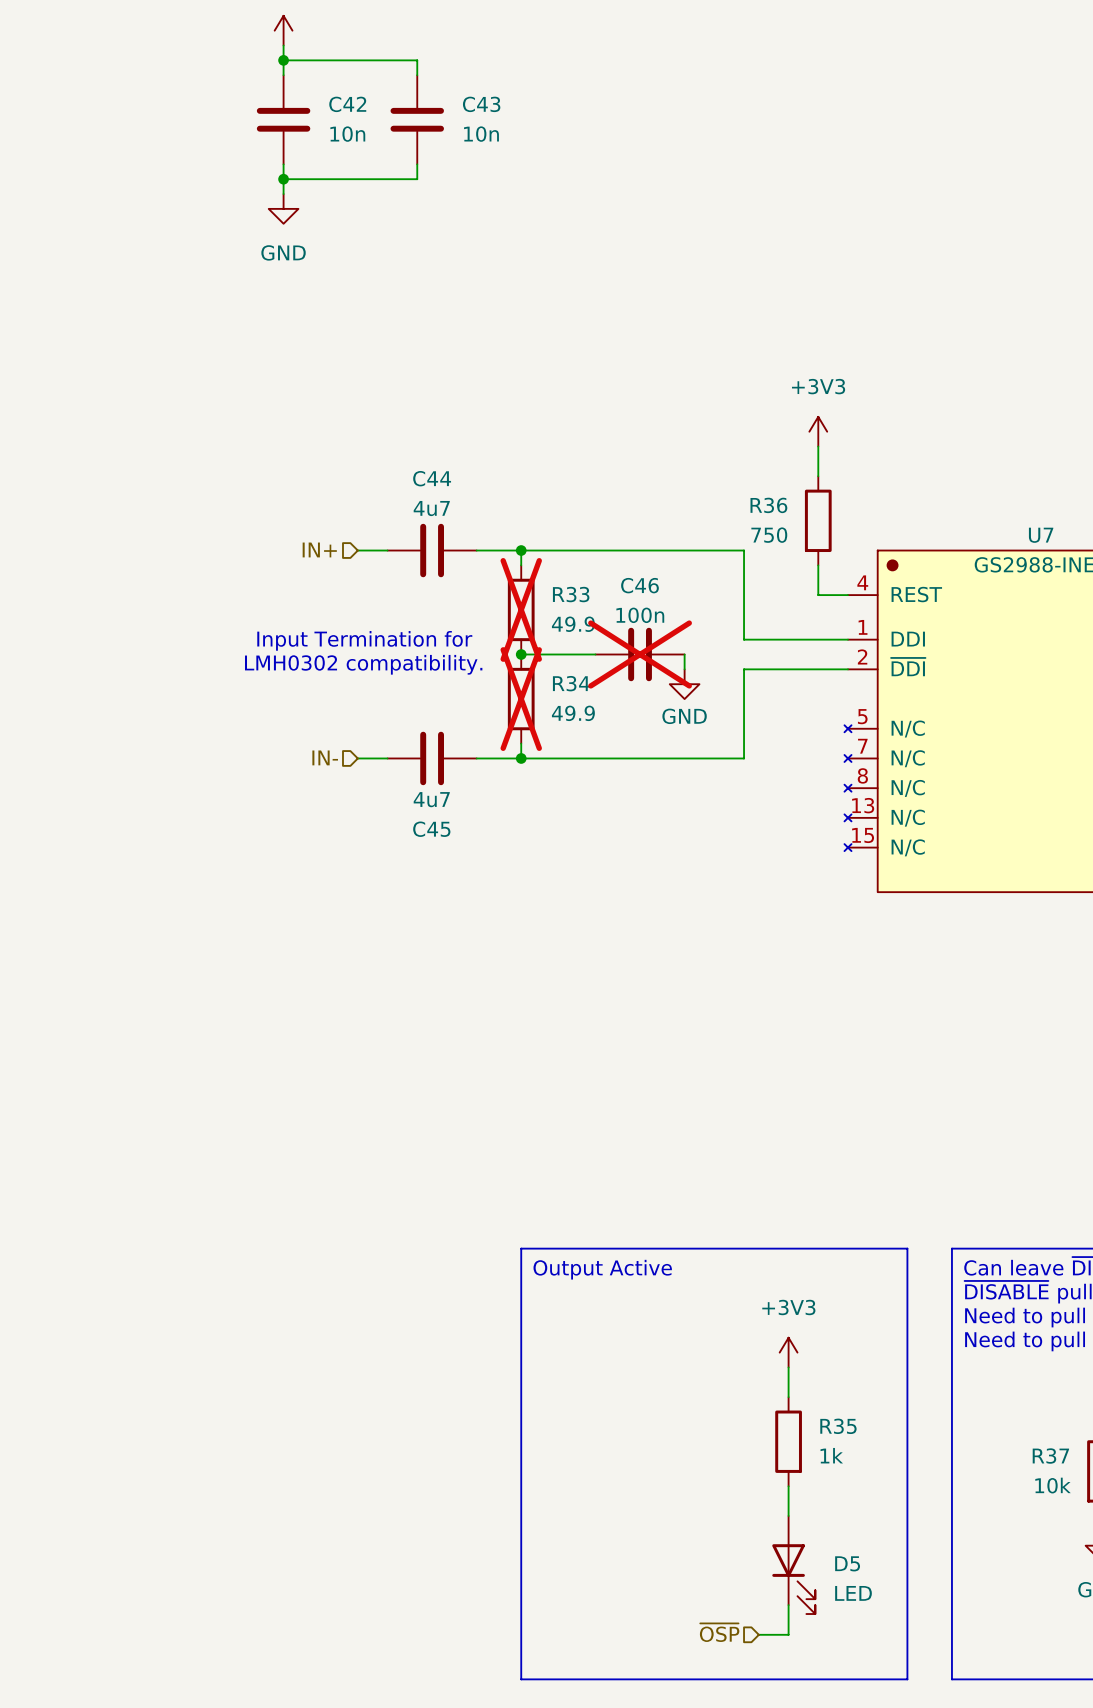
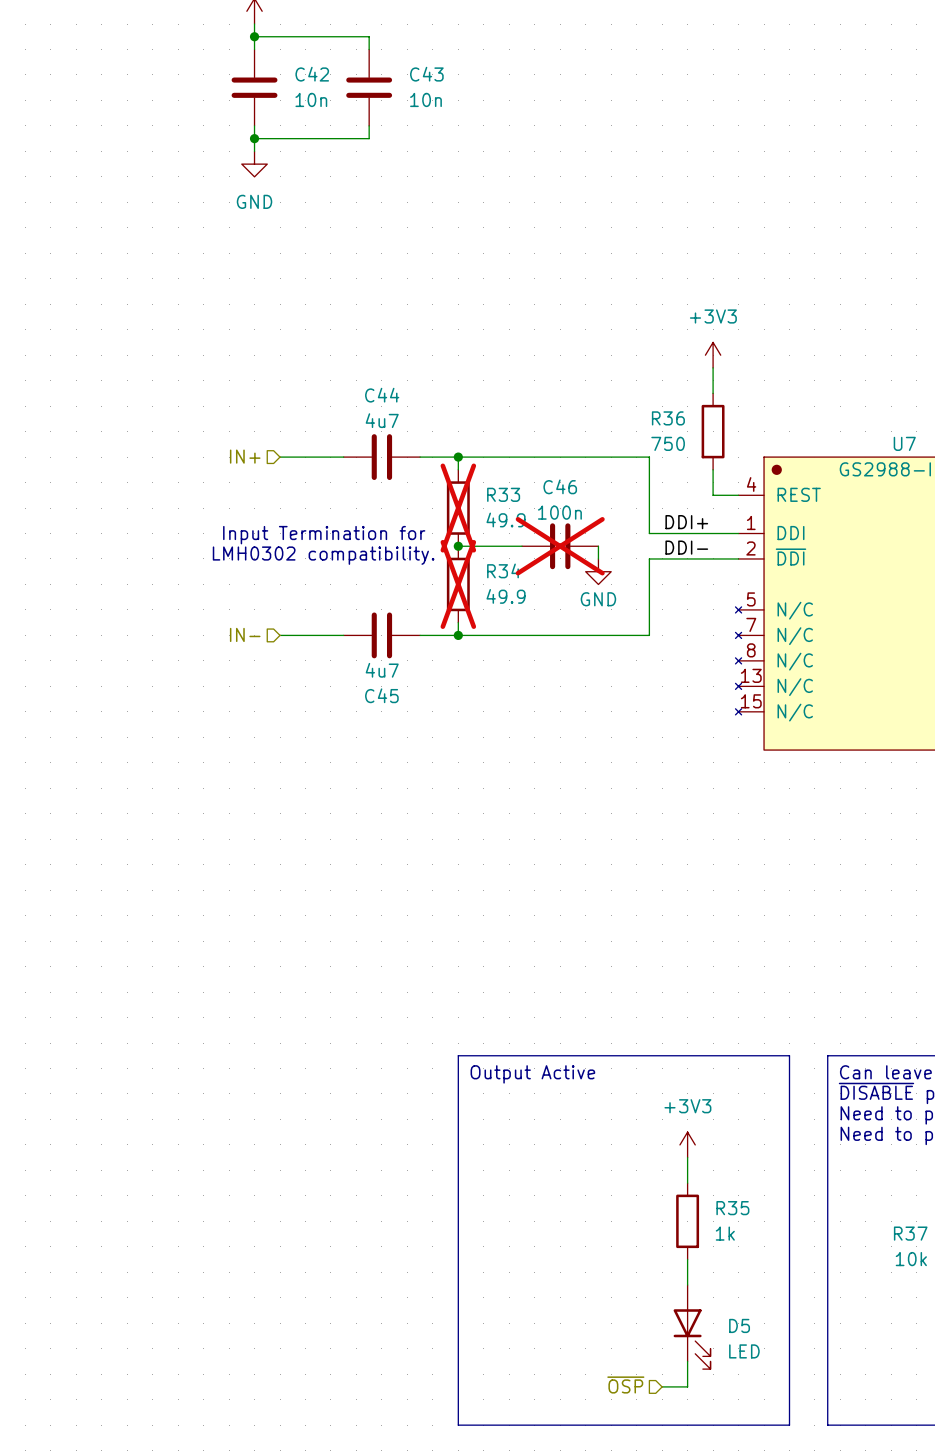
hierarchical label position: IN+ (319, 549) -> IN+ (245, 456)
wire: none -> (280, 457) (318, 457)
label: none -> DDI+ (686, 522)
label: none -> DDI- (686, 547)
hierarchical label position: IN- (325, 757) -> IN- (245, 634)
wire: none -> (280, 635) (318, 635)

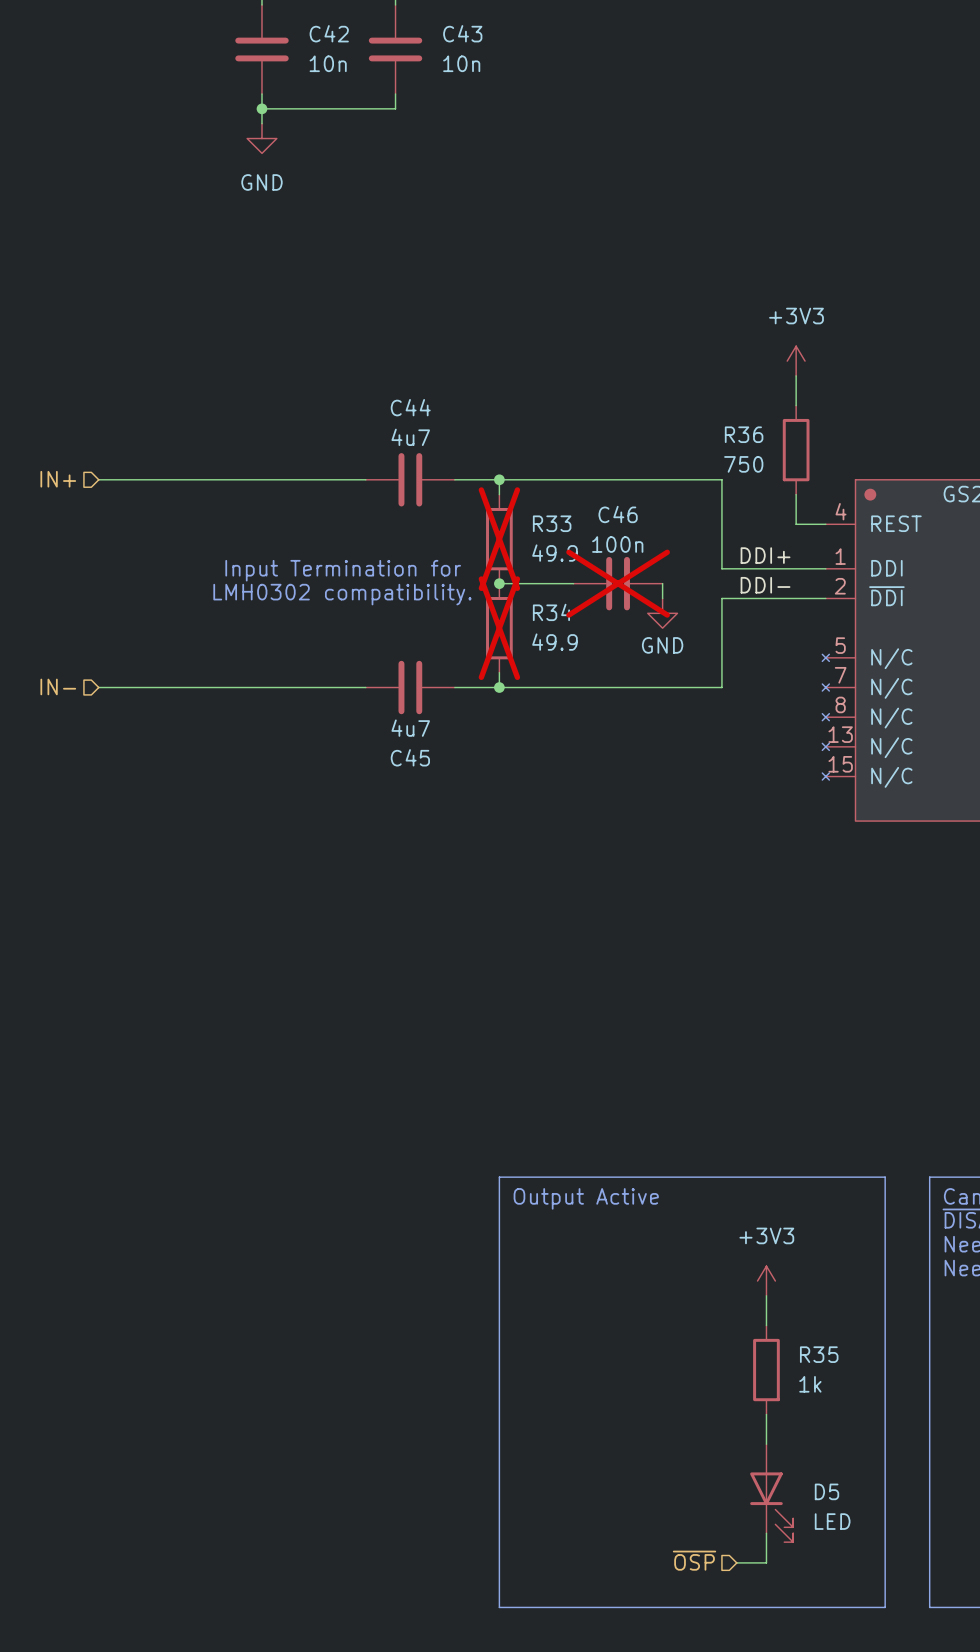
hierarchical label position: IN+ (245, 456) -> IN+ (58, 479)
wire: none -> (98, 479) (291, 479)
hierarchical label position: IN- (245, 634) -> IN- (58, 686)
wire: none -> (98, 687) (291, 687)

